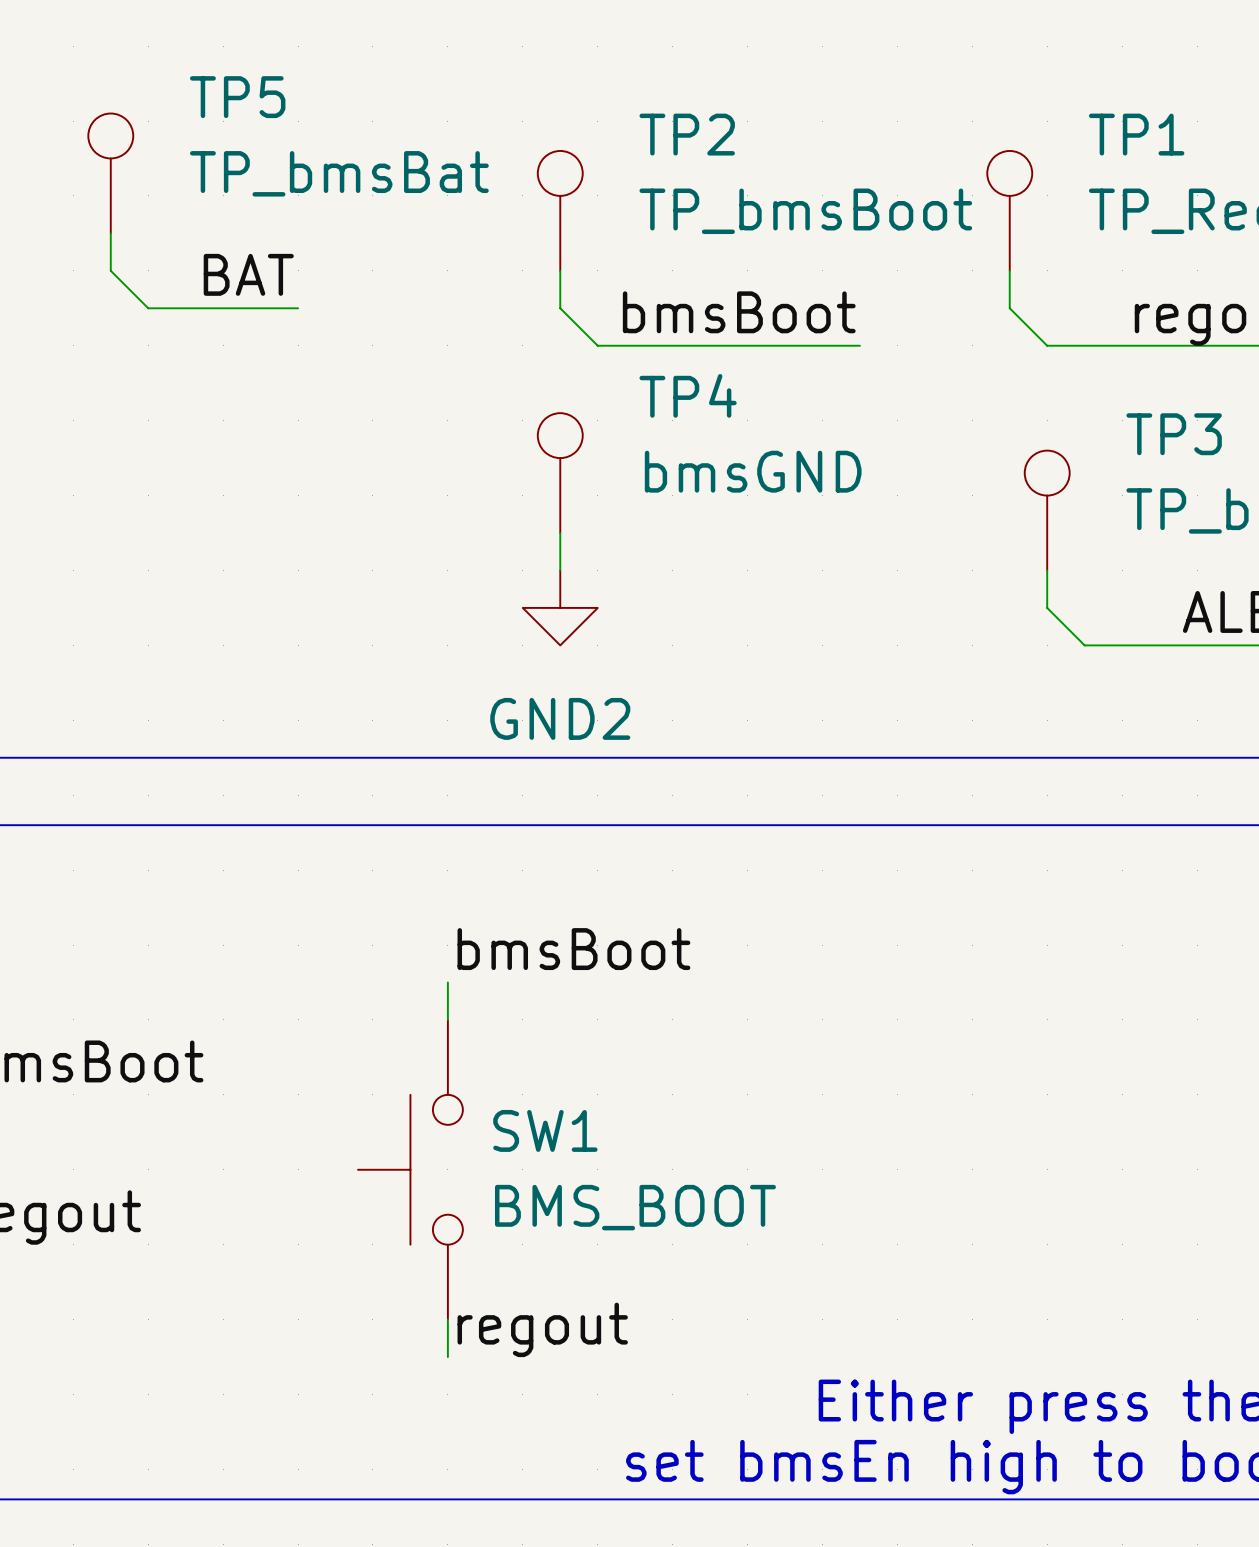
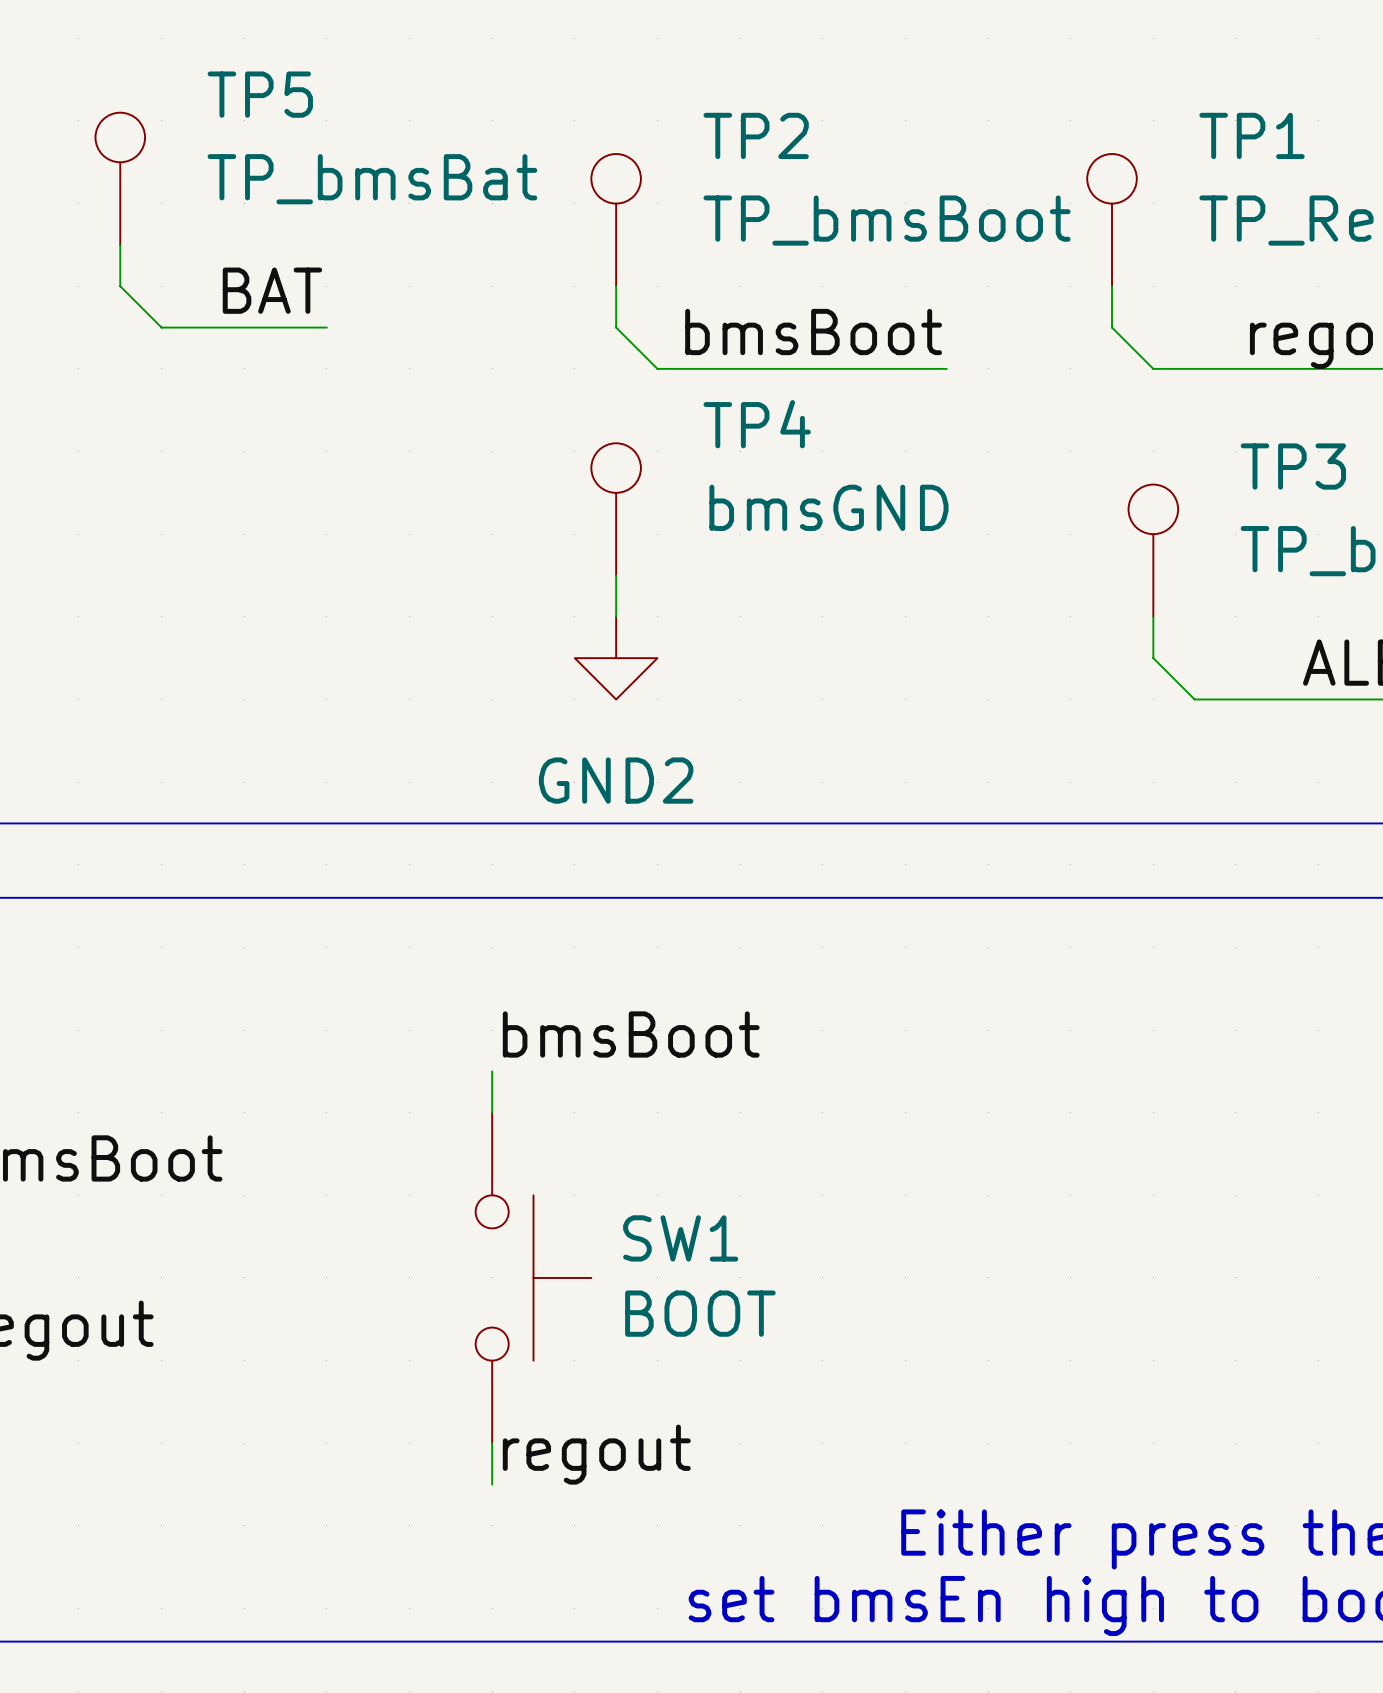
SW1 rotation: 0° (410, 1169) -> 180° (533, 1277)
SW1 value: BMS_BOOT (635, 1207) -> BOOT (700, 1313)

